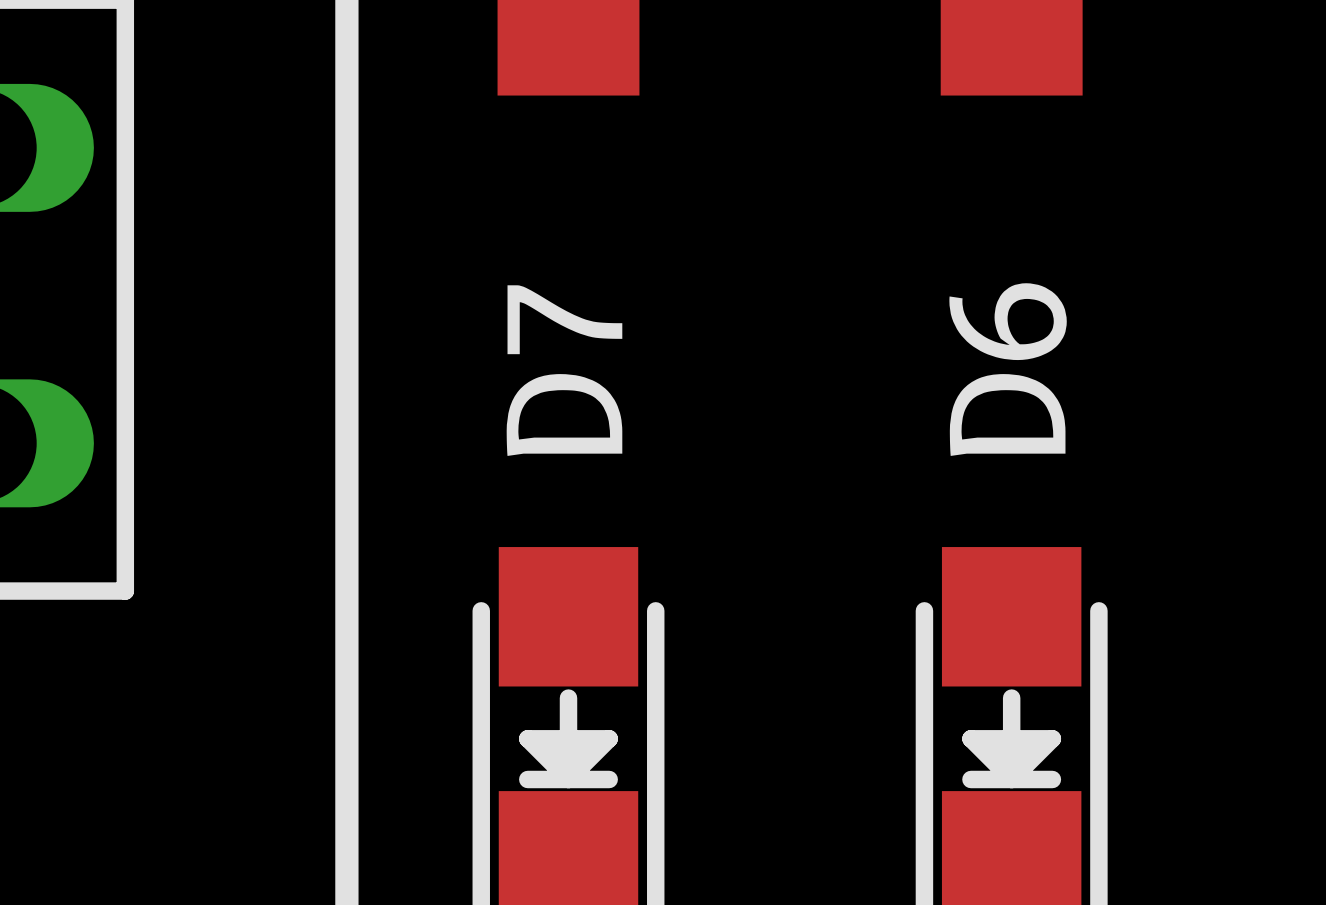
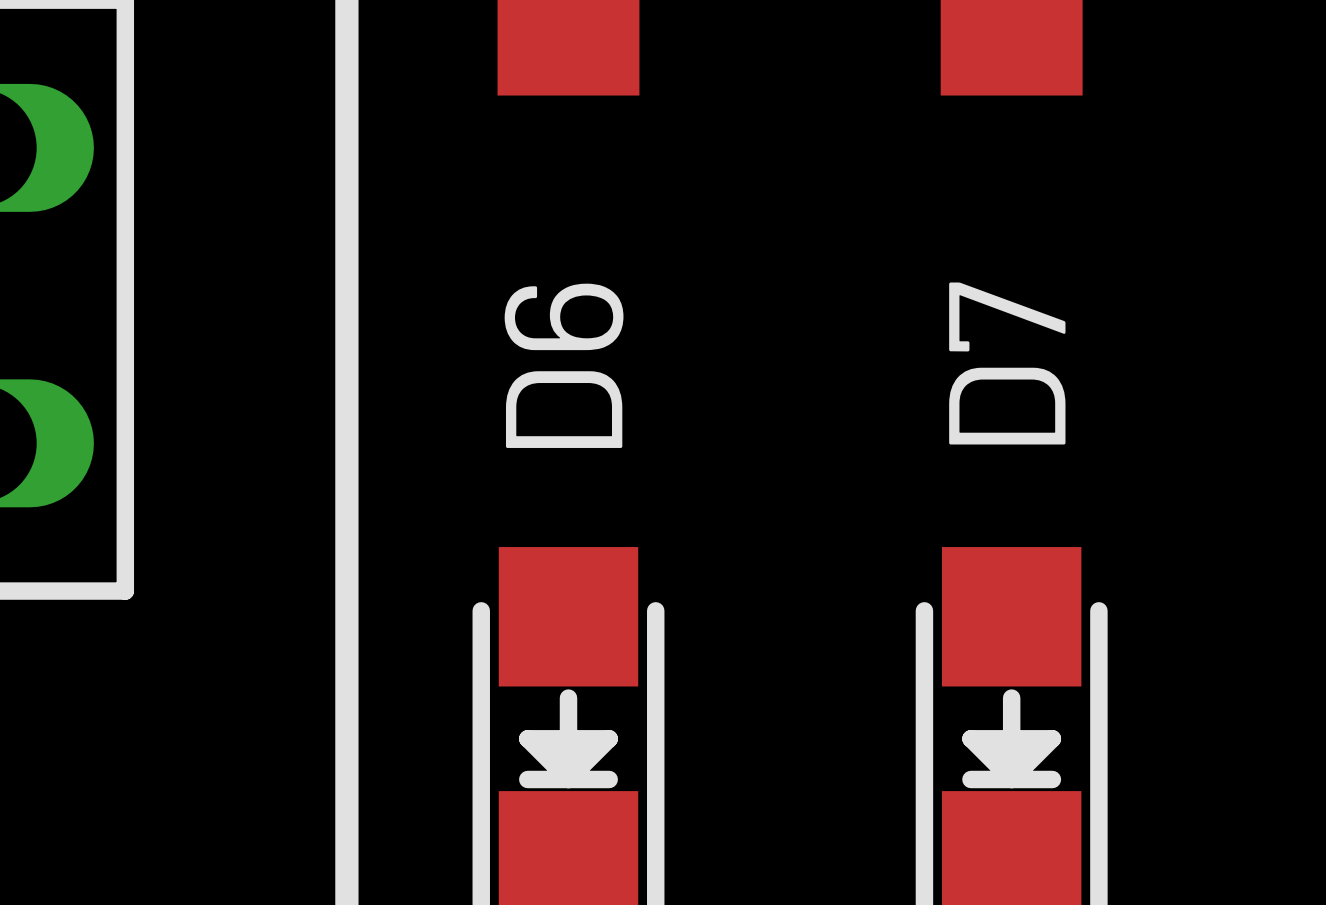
D6 name: D6 (1008, 369) -> D7 (1007, 363)
D7 name: D7 (564, 370) -> D6 (564, 365)

